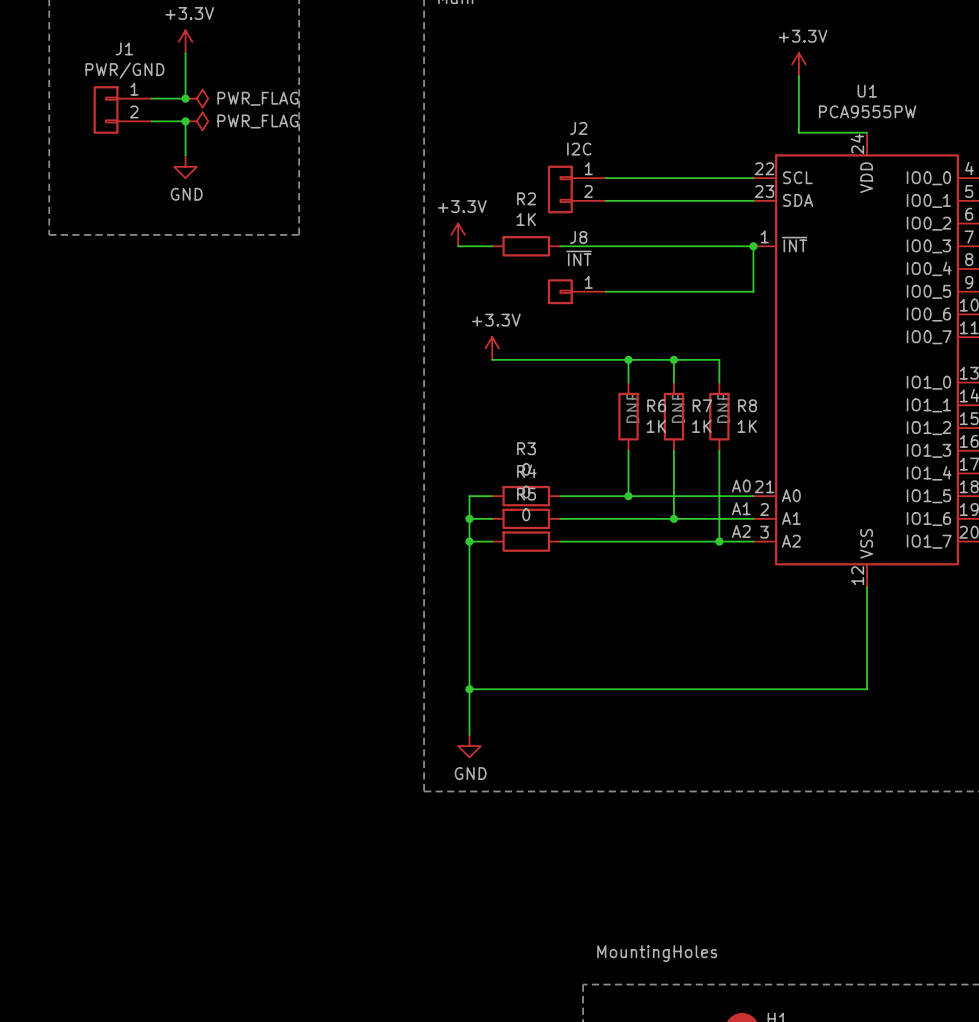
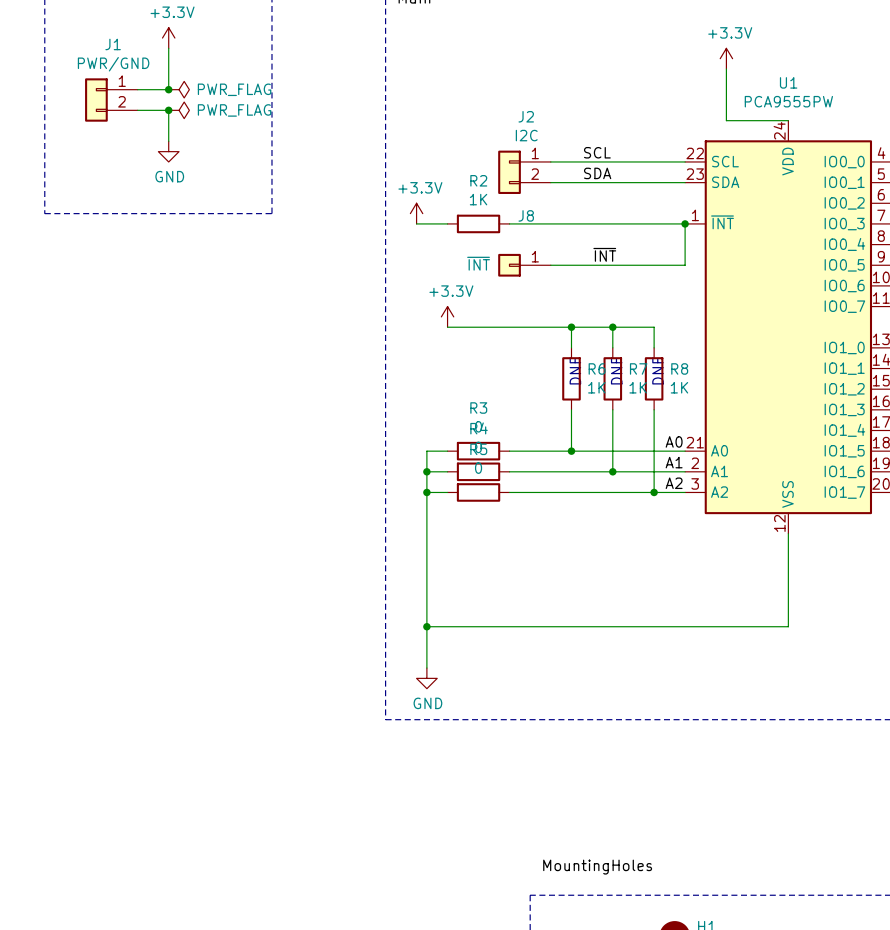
label: none -> SCL (597, 152)
label: none -> SDA (597, 173)
J8 value position: ~{INT} (579, 258) -> ~{INT} (478, 263)
label: none -> ~{INT} (604, 254)

